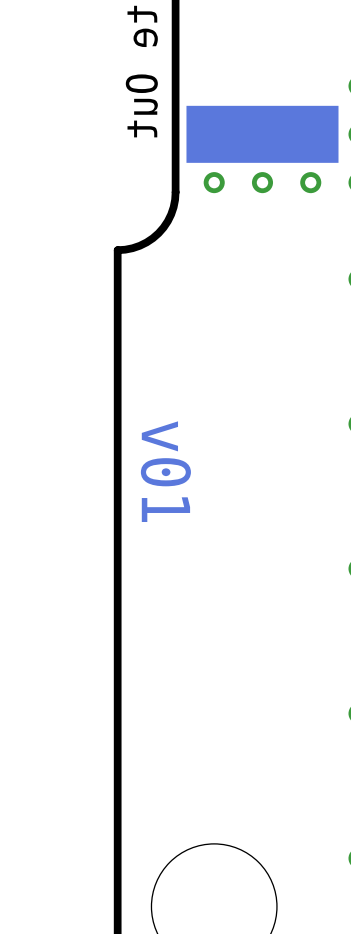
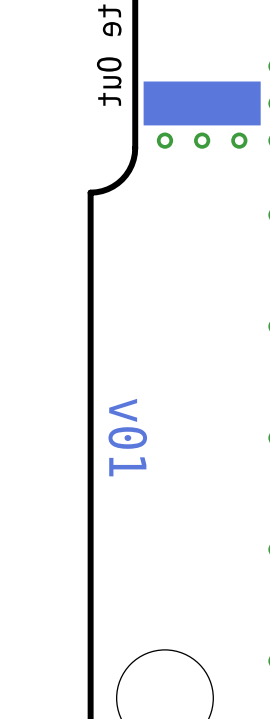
text position: v01 (165, 471) -> v01 (127, 437)

